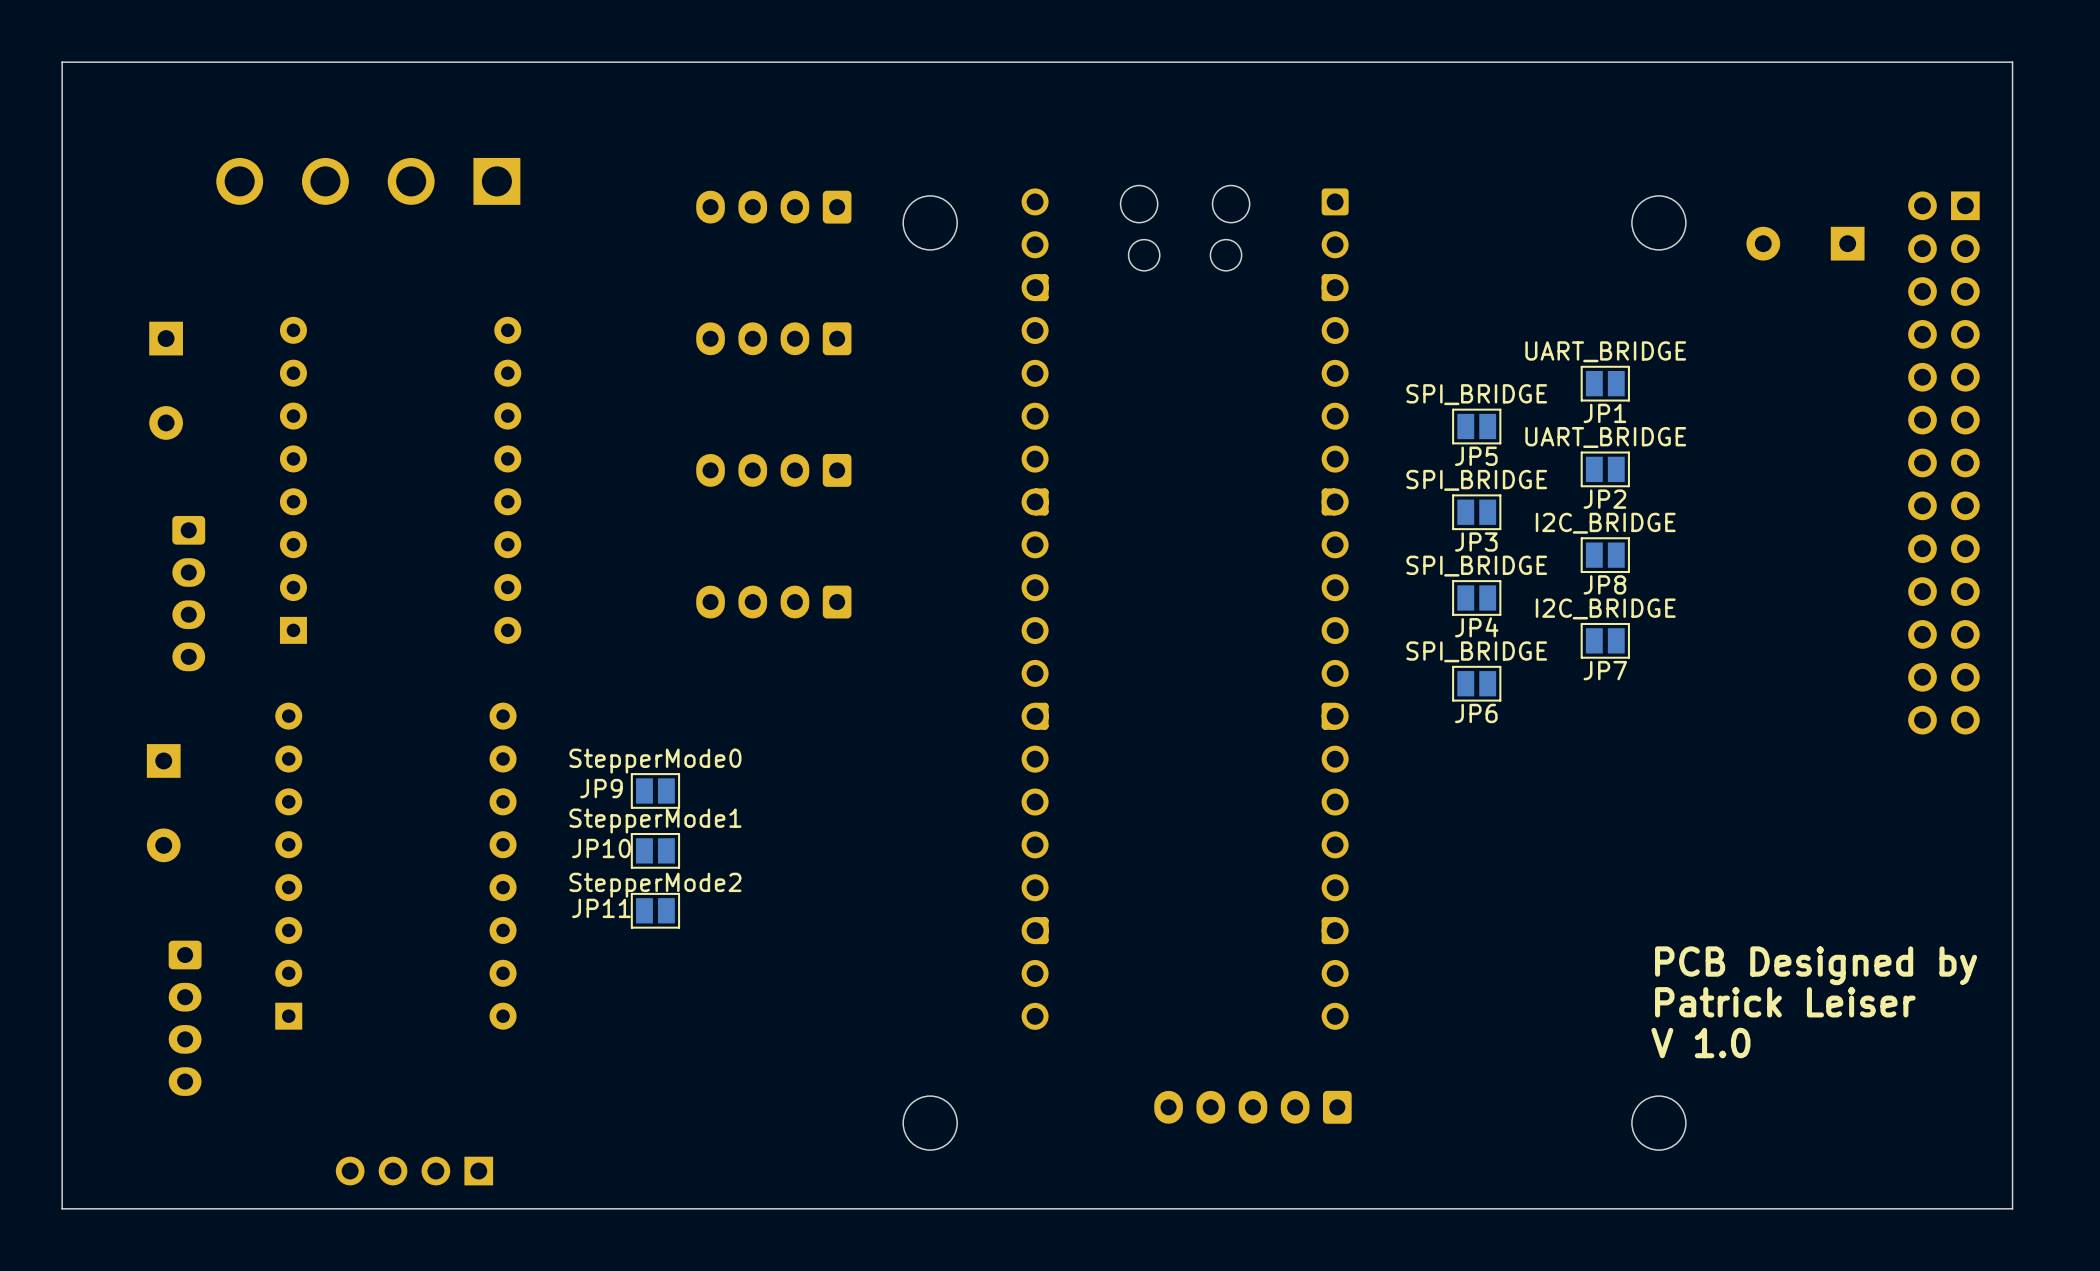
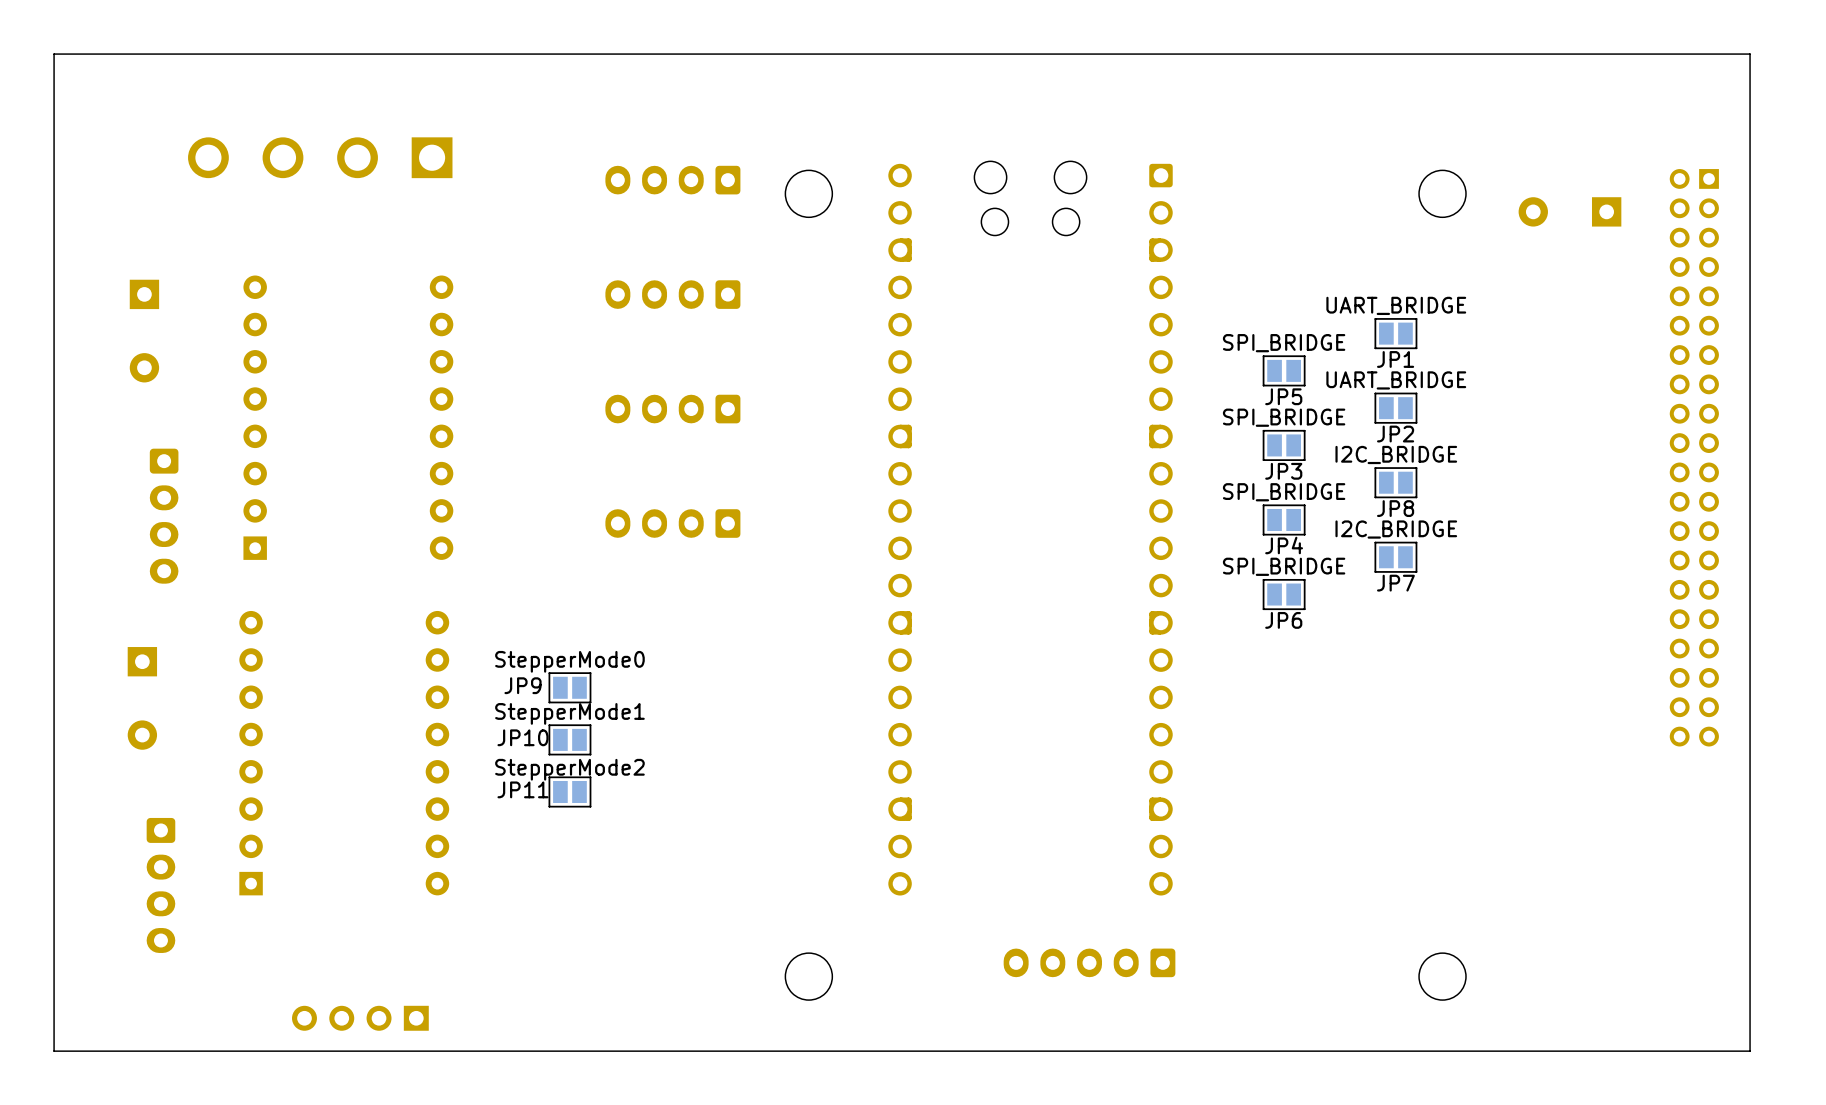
part: (1943, 462) -> none
part: none -> (1694, 457)
text: PCB Designed by (1816, 965) -> none
text: Patrick Leiser (1785, 1002) -> none
text: V 1.0 (1700, 1043) -> none

